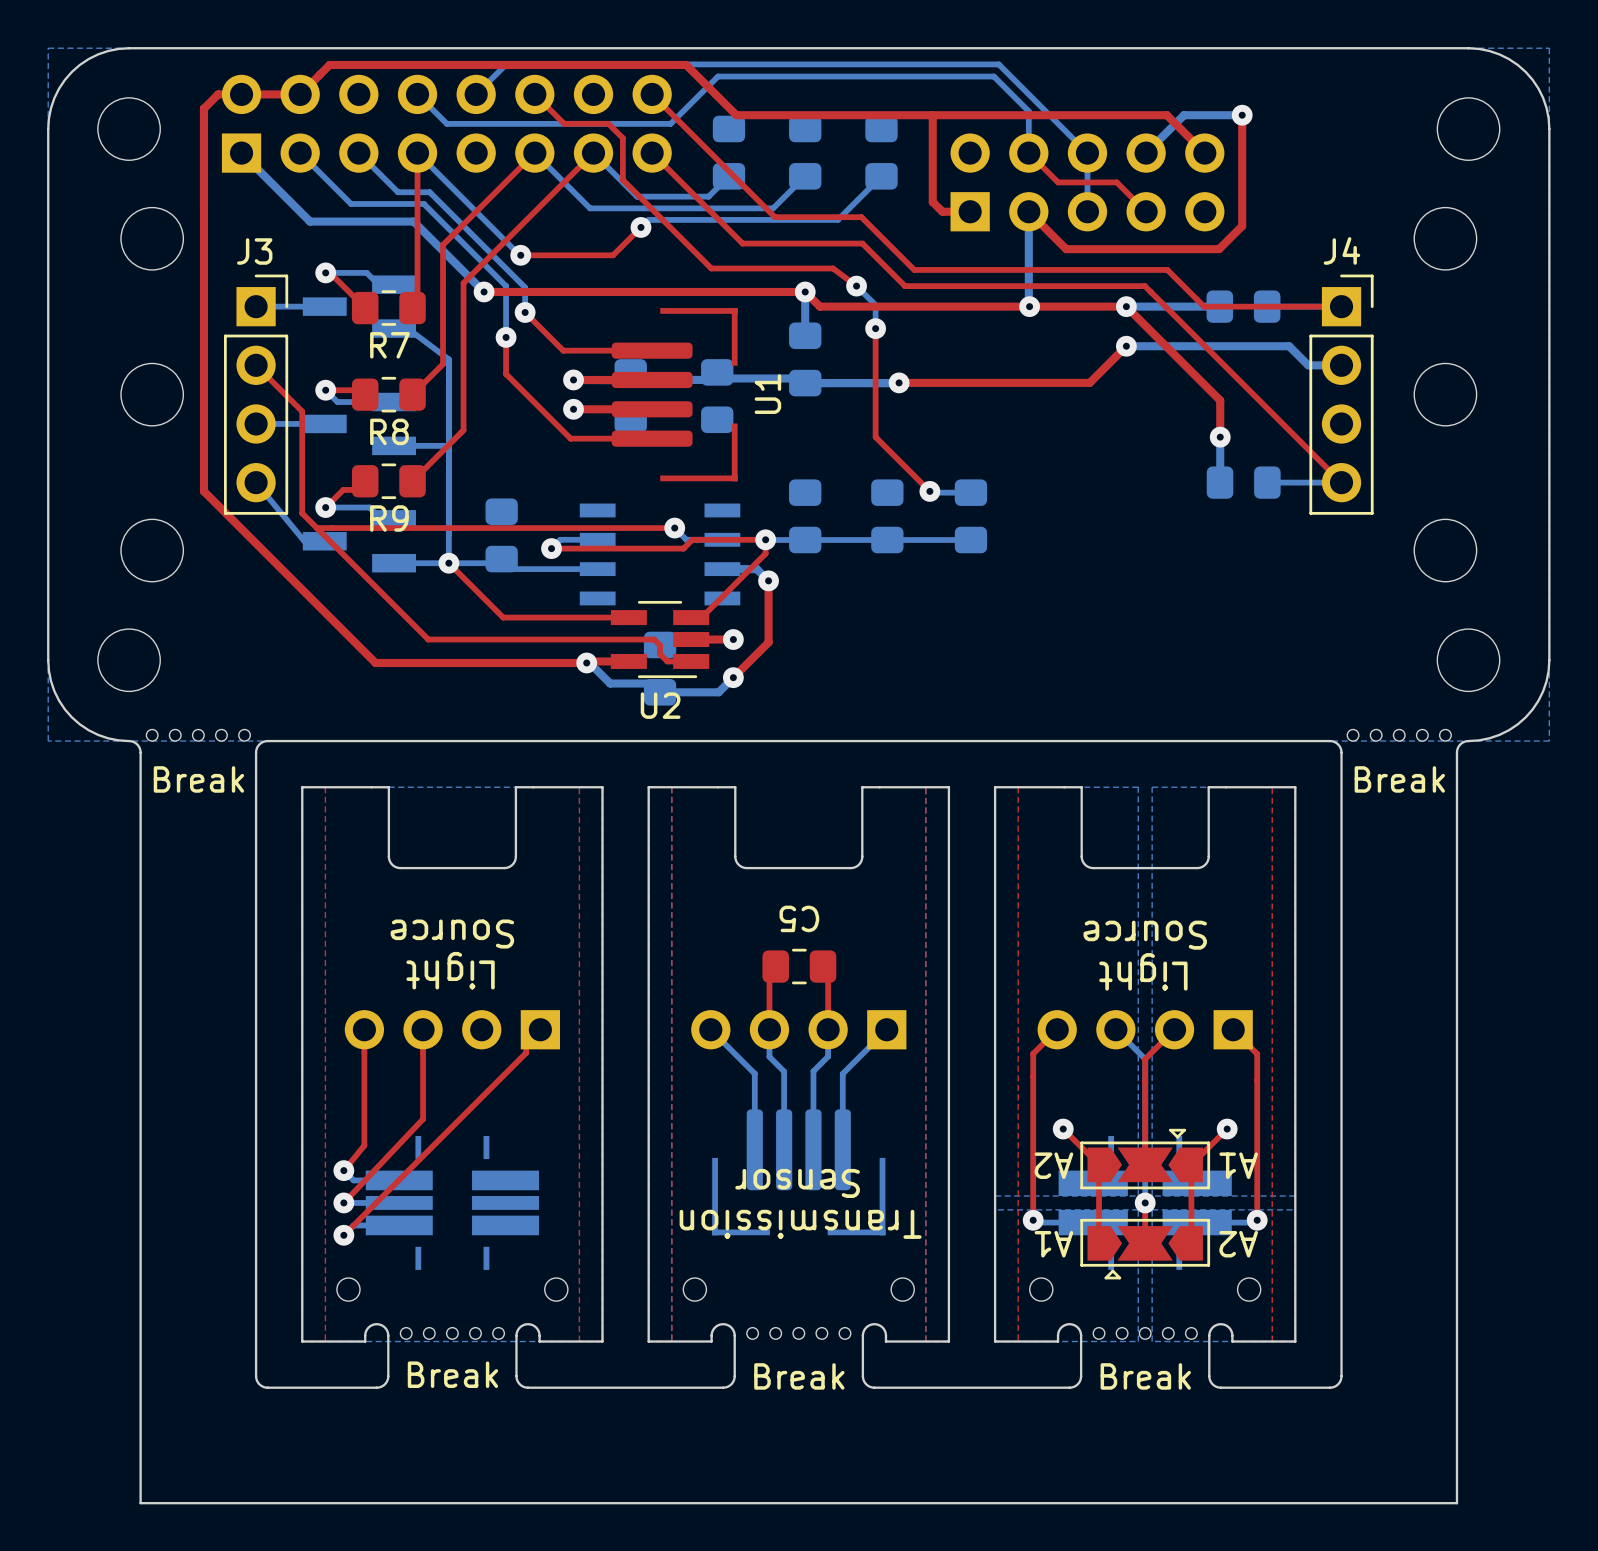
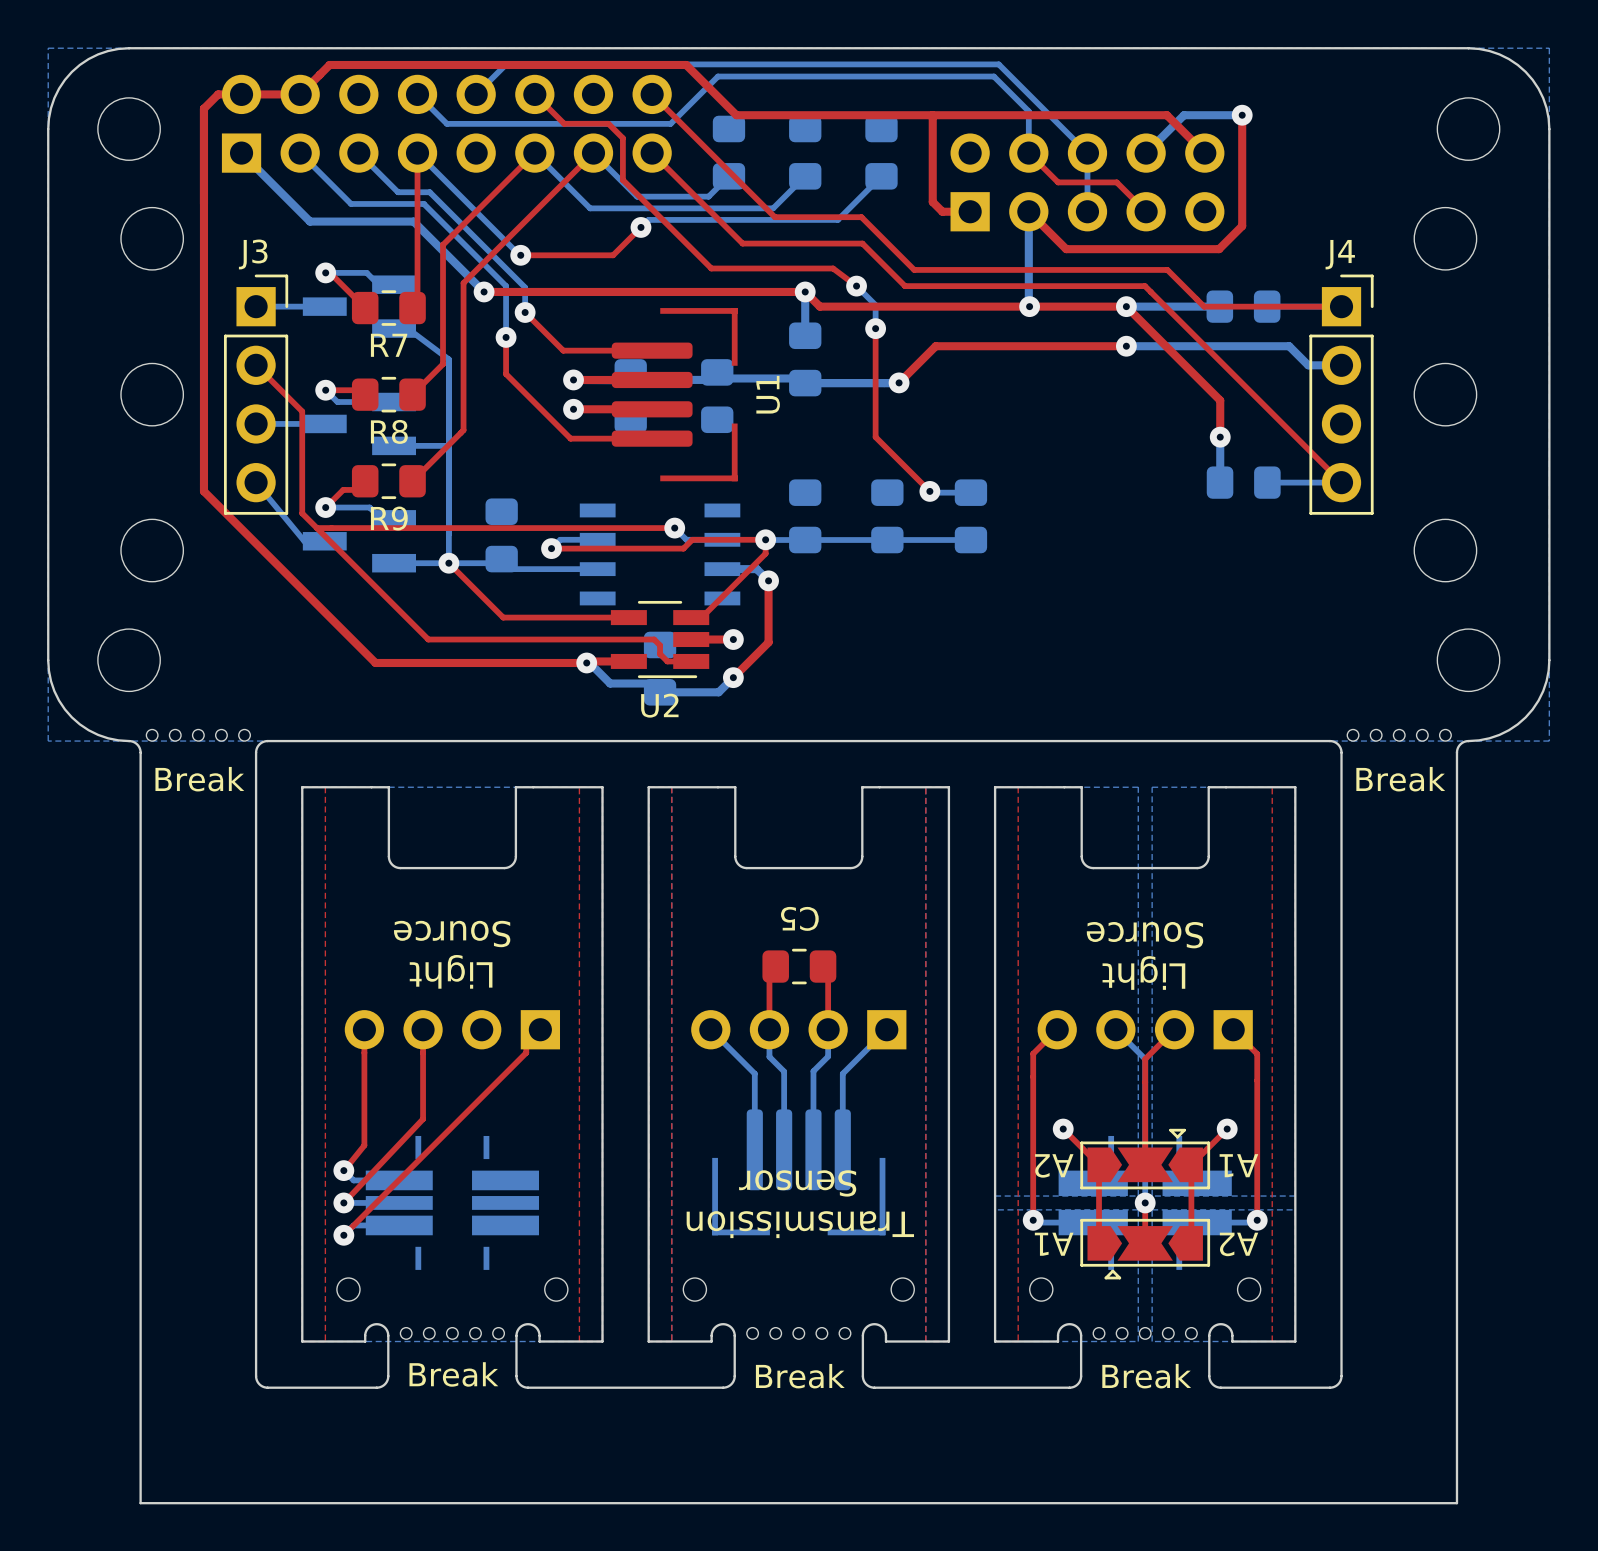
top track: (1126, 346) (1089, 382) (899, 382) -> (1126, 346) (935, 346) (899, 382)

